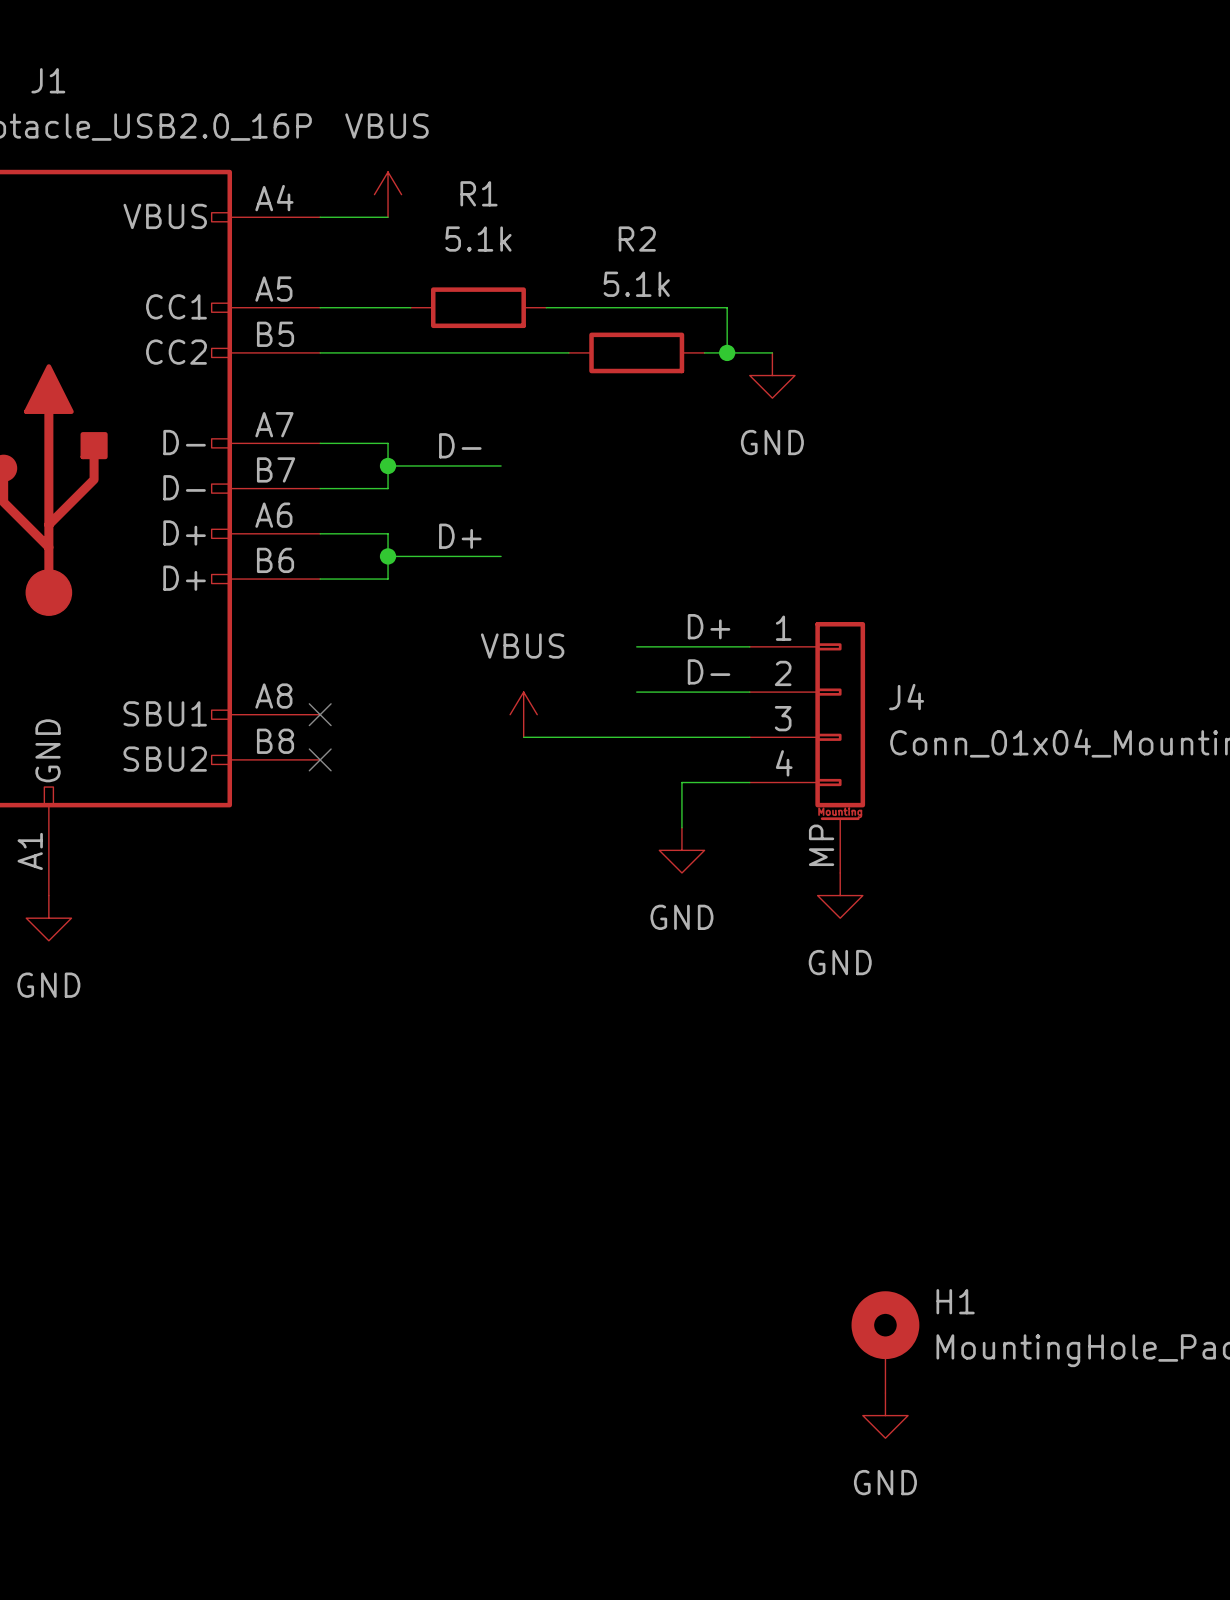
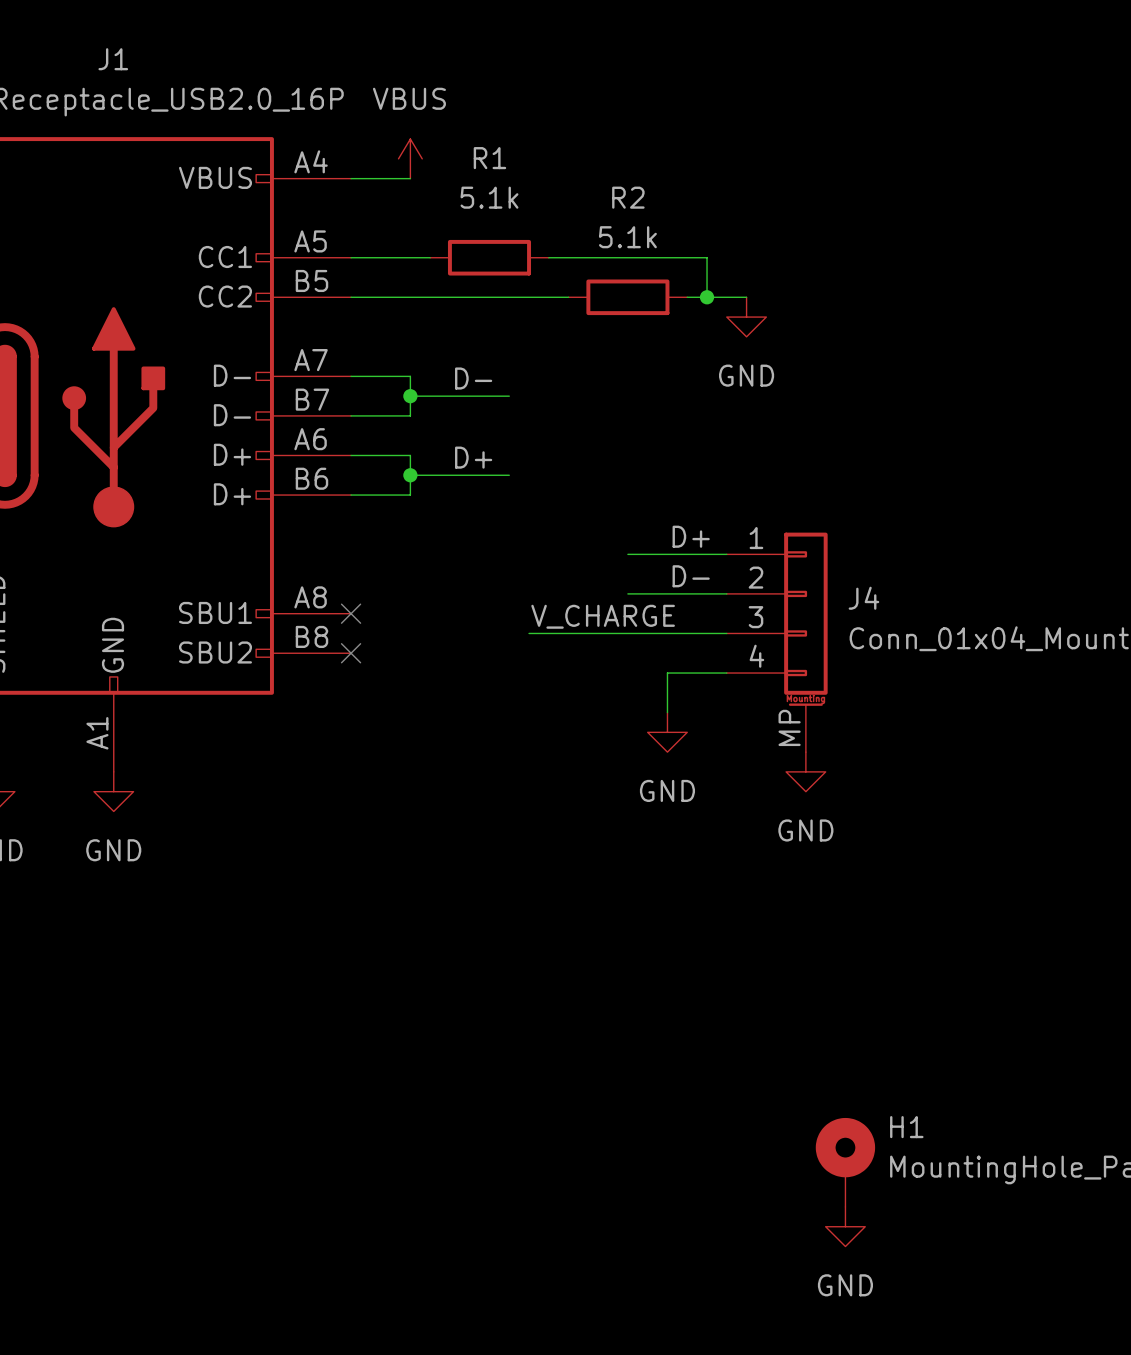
power symbol: VBUS (523, 714) -> none
label: none -> V_CHARGE (603, 616)

